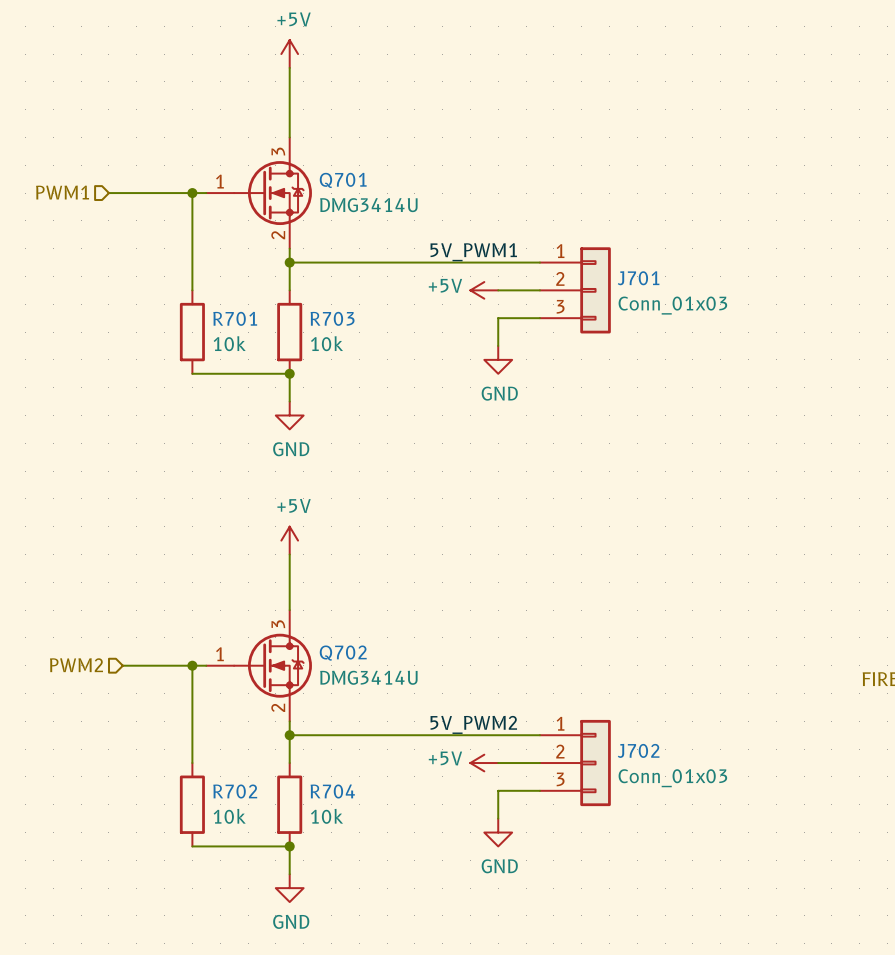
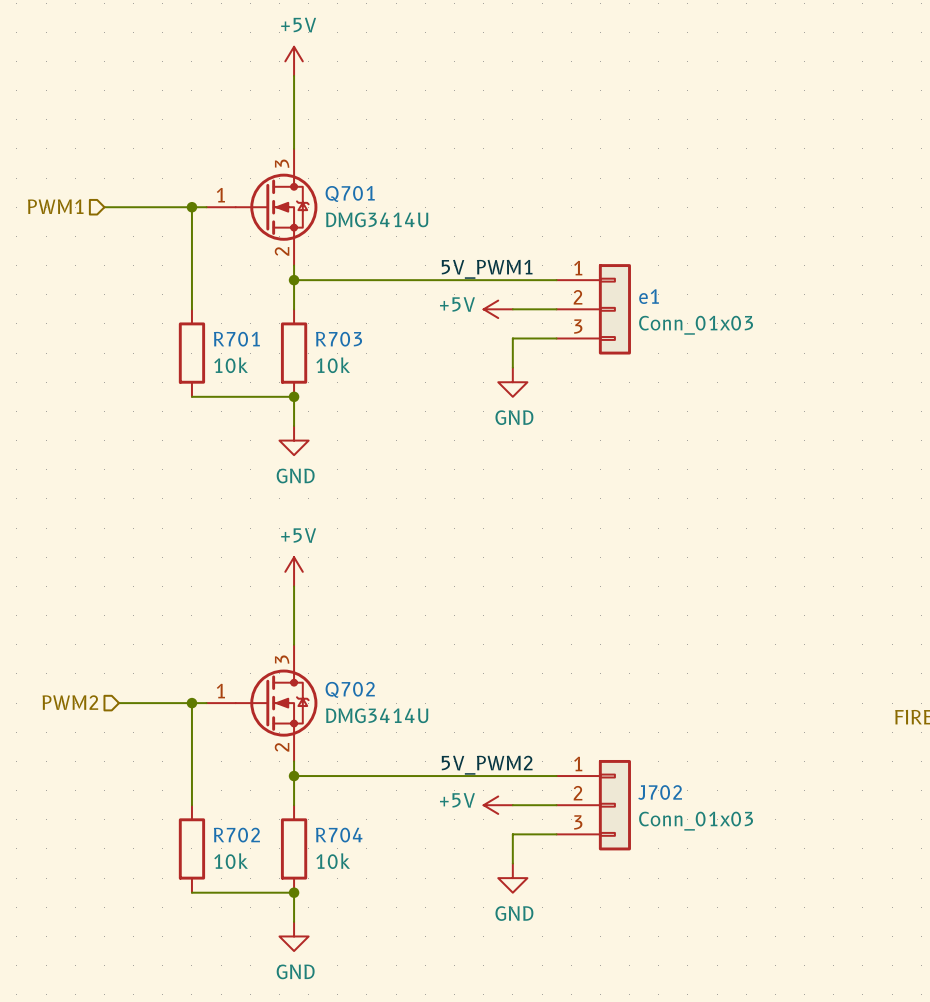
J701 name: J701 (638, 278) -> e1 (649, 296)

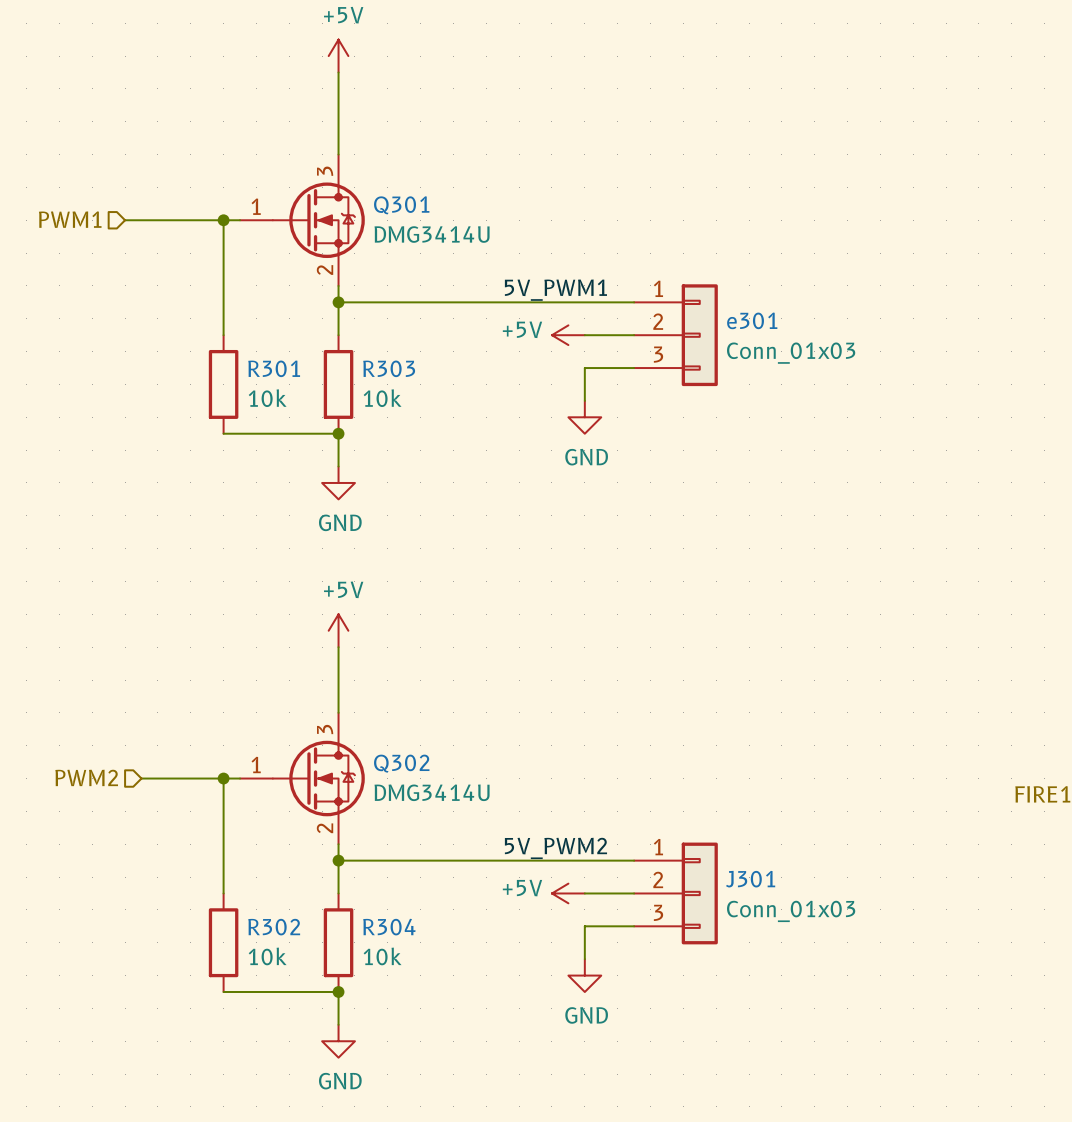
Q701 name: Q701 (350, 193) -> Q301 (401, 205)
e1 name: e1 (649, 296) -> e301 (752, 320)
R701 name: R701 (236, 339) -> R301 (274, 368)
R703 name: R703 (339, 339) -> R303 (389, 368)
Q702 name: Q702 (350, 689) -> Q302 (401, 763)
J702 name: J702 (660, 792) -> J301 (750, 879)
R702 name: R702 (236, 835) -> R302 (274, 927)
R704 name: R704 (339, 835) -> R304 (389, 927)

